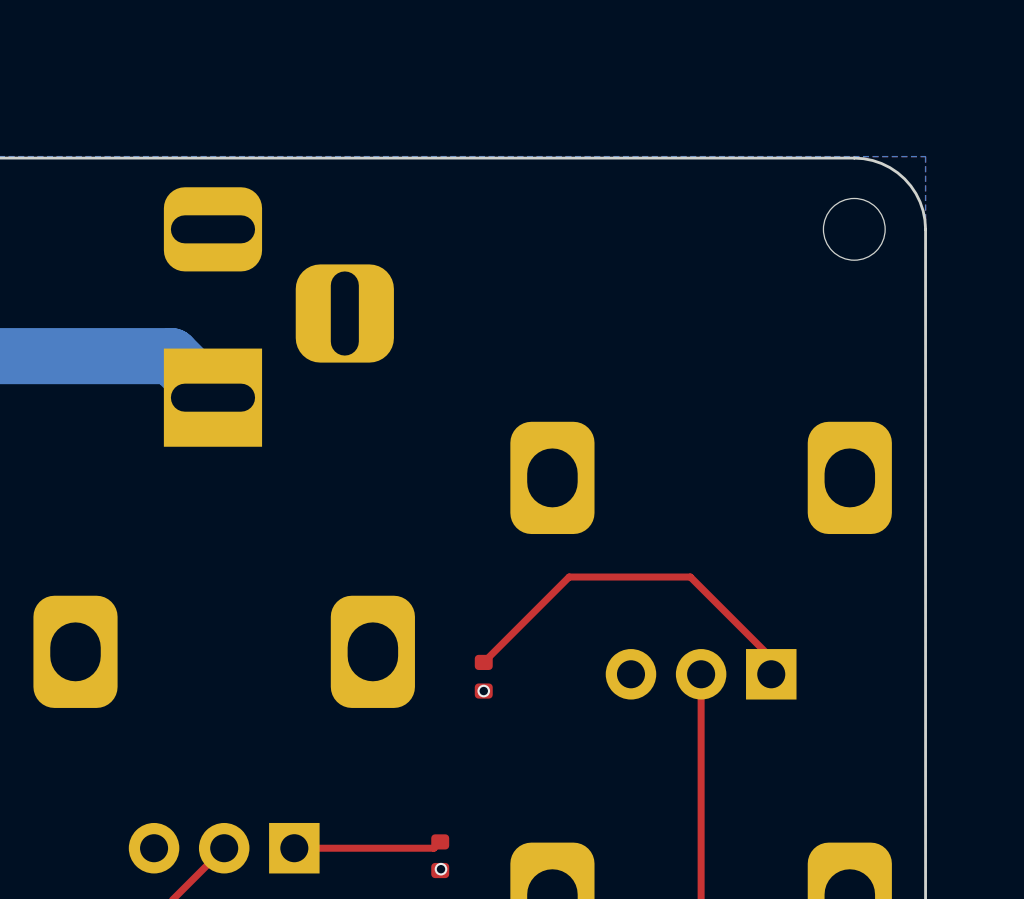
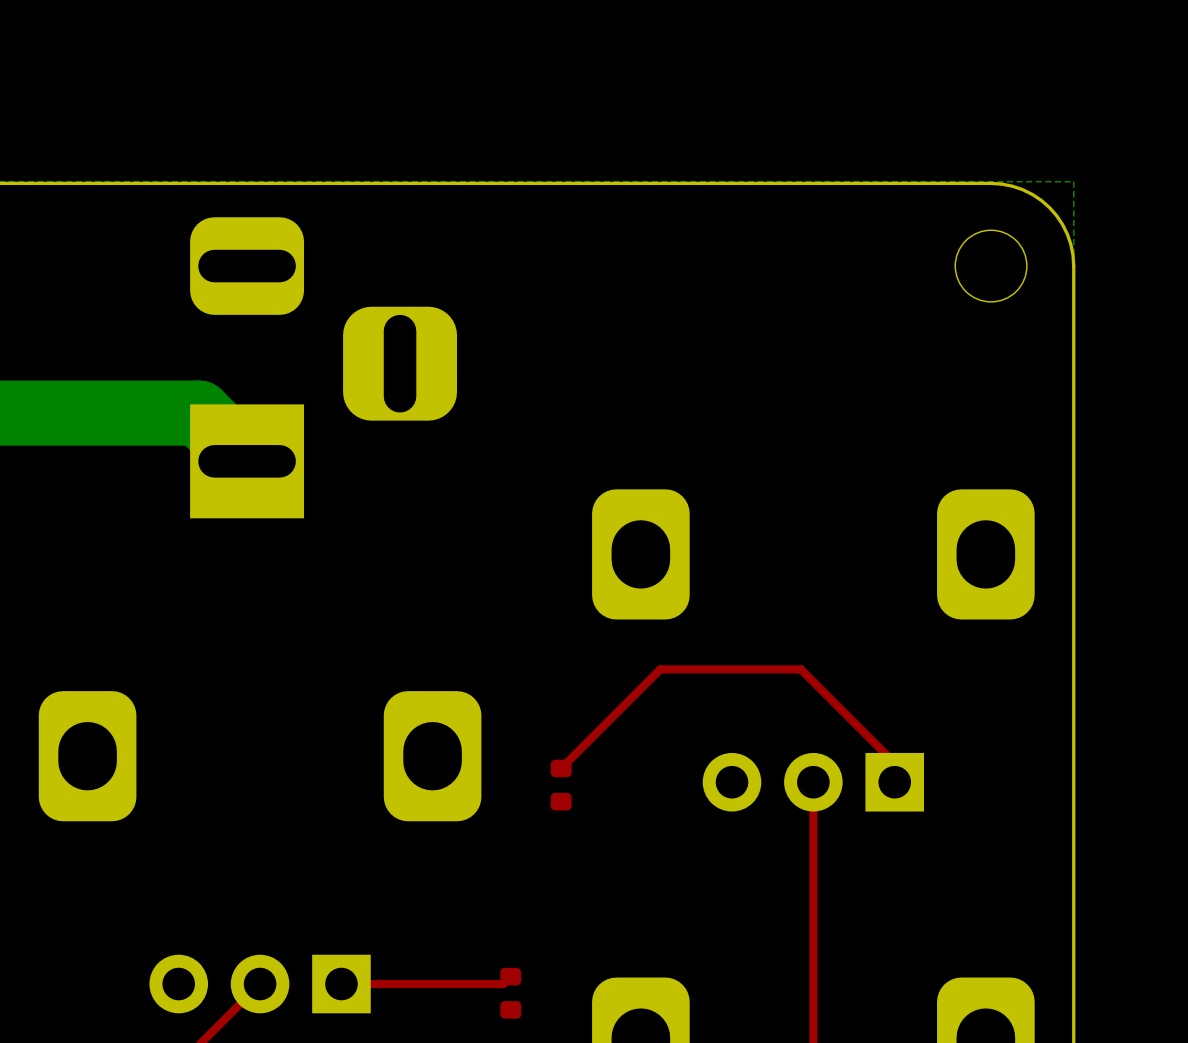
via: (483, 691) -> none
via: (441, 869) -> none

